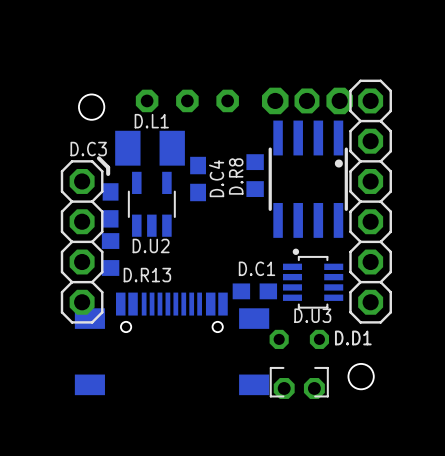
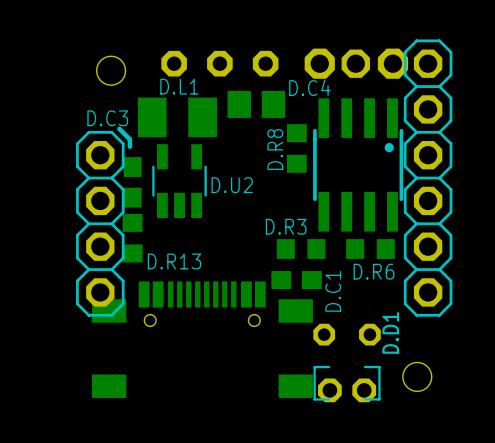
part footprint: [268, 120, 348, 238] -> [313, 98, 404, 232]
D.C4 footprint: [190, 156, 207, 202] -> [227, 90, 286, 118]
D.C4 name position: D.C4 (216, 178) -> D.C4 (309, 87)
D.U2 name position: D.U2 (151, 245) -> D.U2 (232, 185)
D.R3: none -> (301, 249)
D.R6: none -> (370, 249)
D.C1 name rotation: 0° (257, 268) -> 90° counterclockwise (333, 291)
D.U3: (313, 278) -> none
D.D1 name rotation: 0° (353, 337) -> 90° counterclockwise (390, 332)

